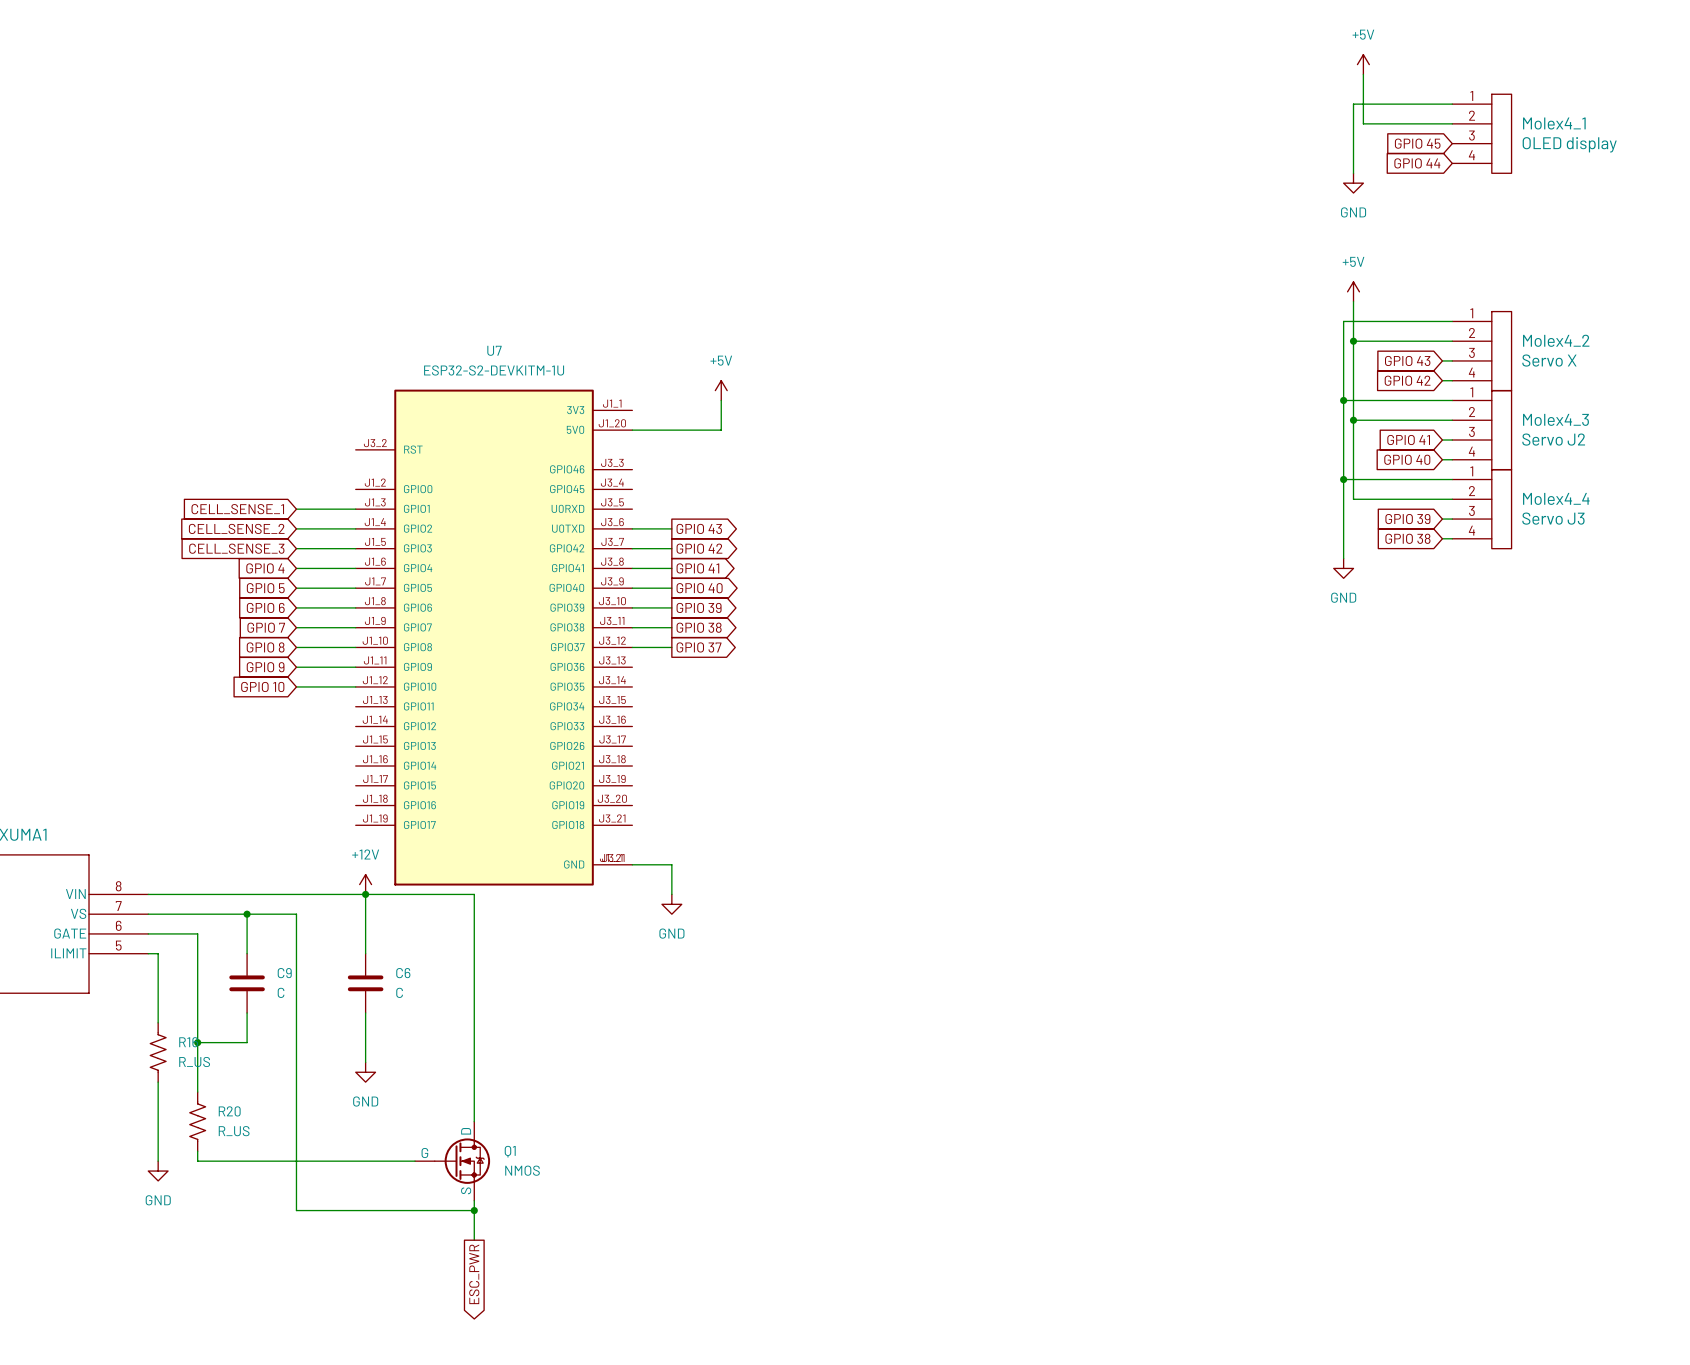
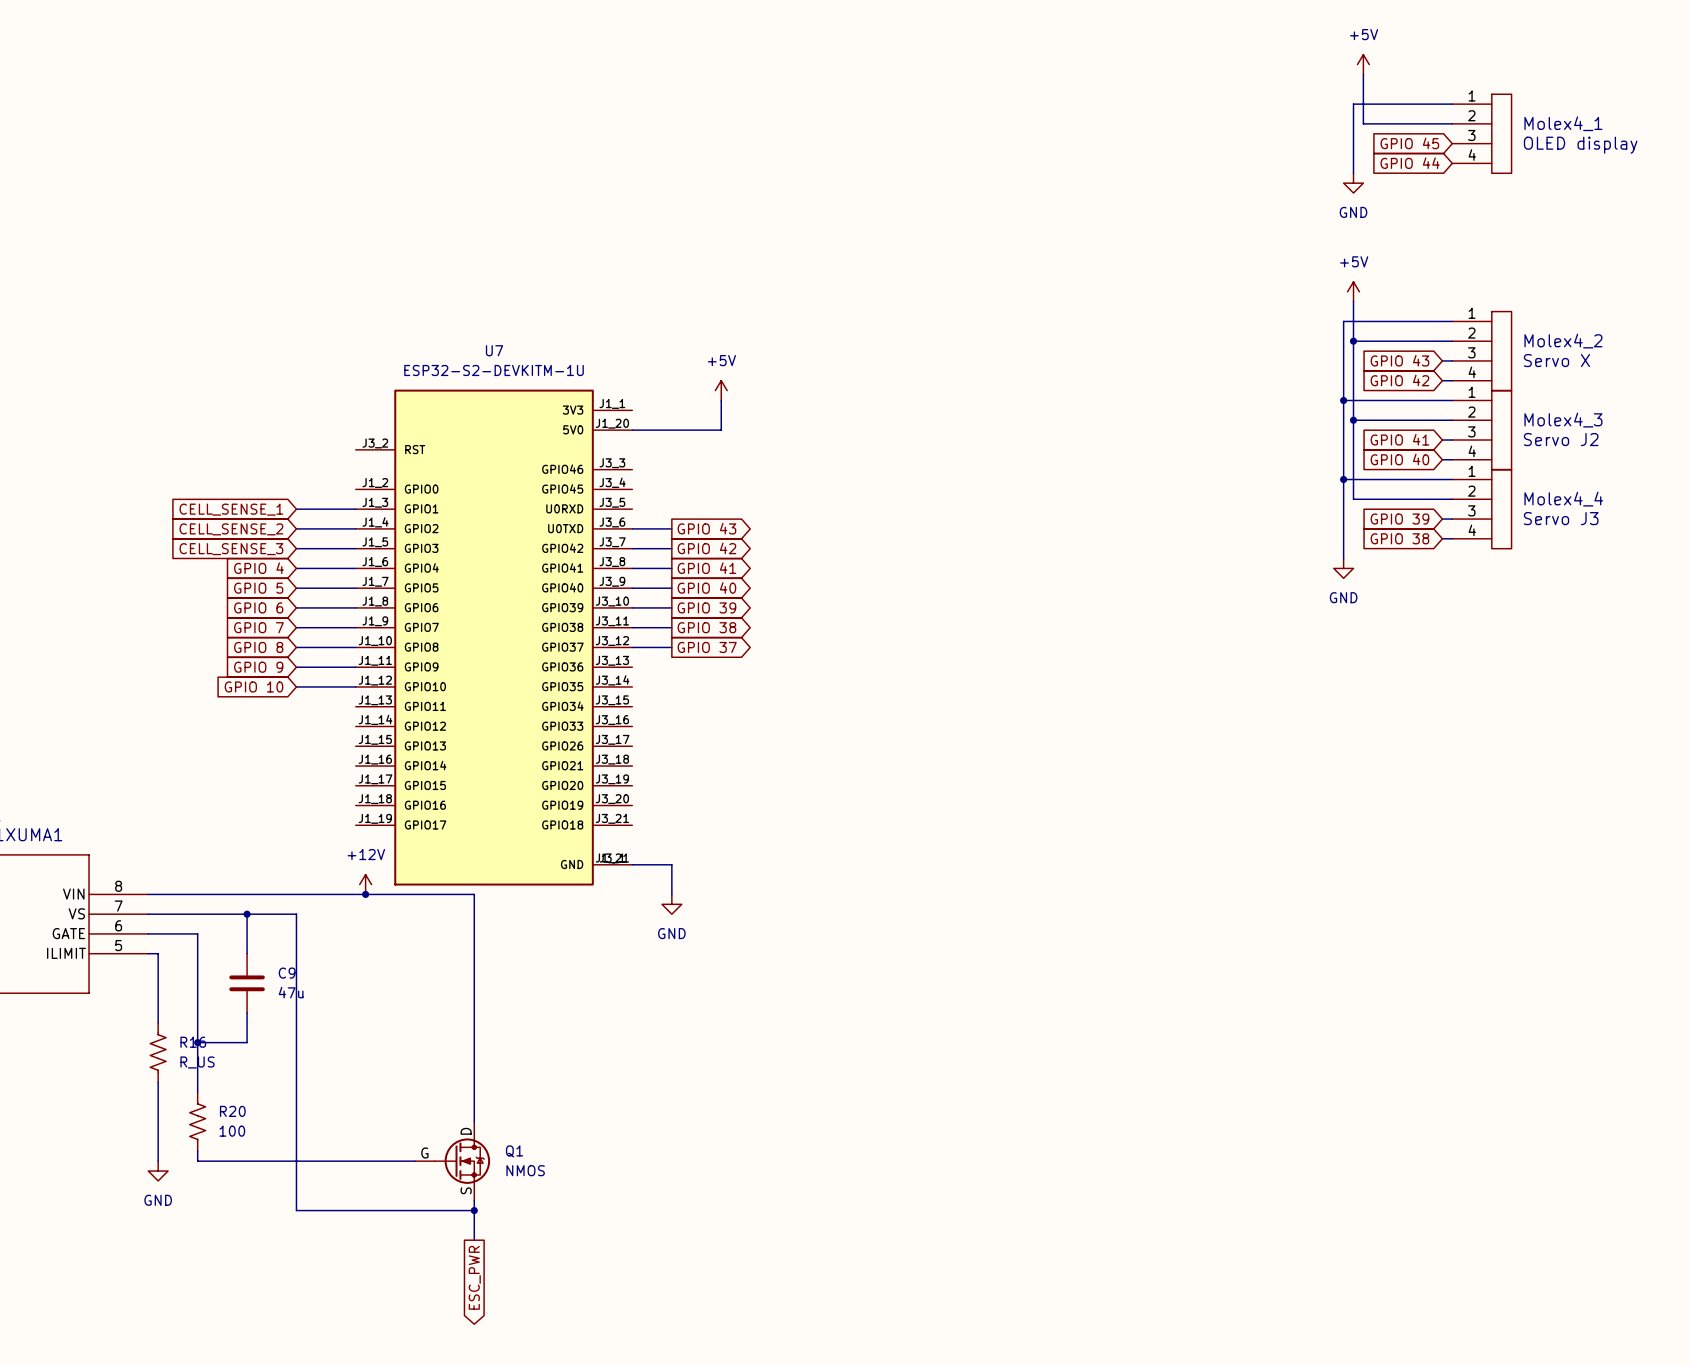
wire: (365, 894) (365, 953) -> none
C6: C (365, 983) -> none
C9 value: C (281, 992) -> 47u (291, 992)
wire: (365, 1012) (365, 1062) -> none
power symbol: GND (365, 1072) -> none
R20 value: R_US (234, 1131) -> 100 (232, 1131)

